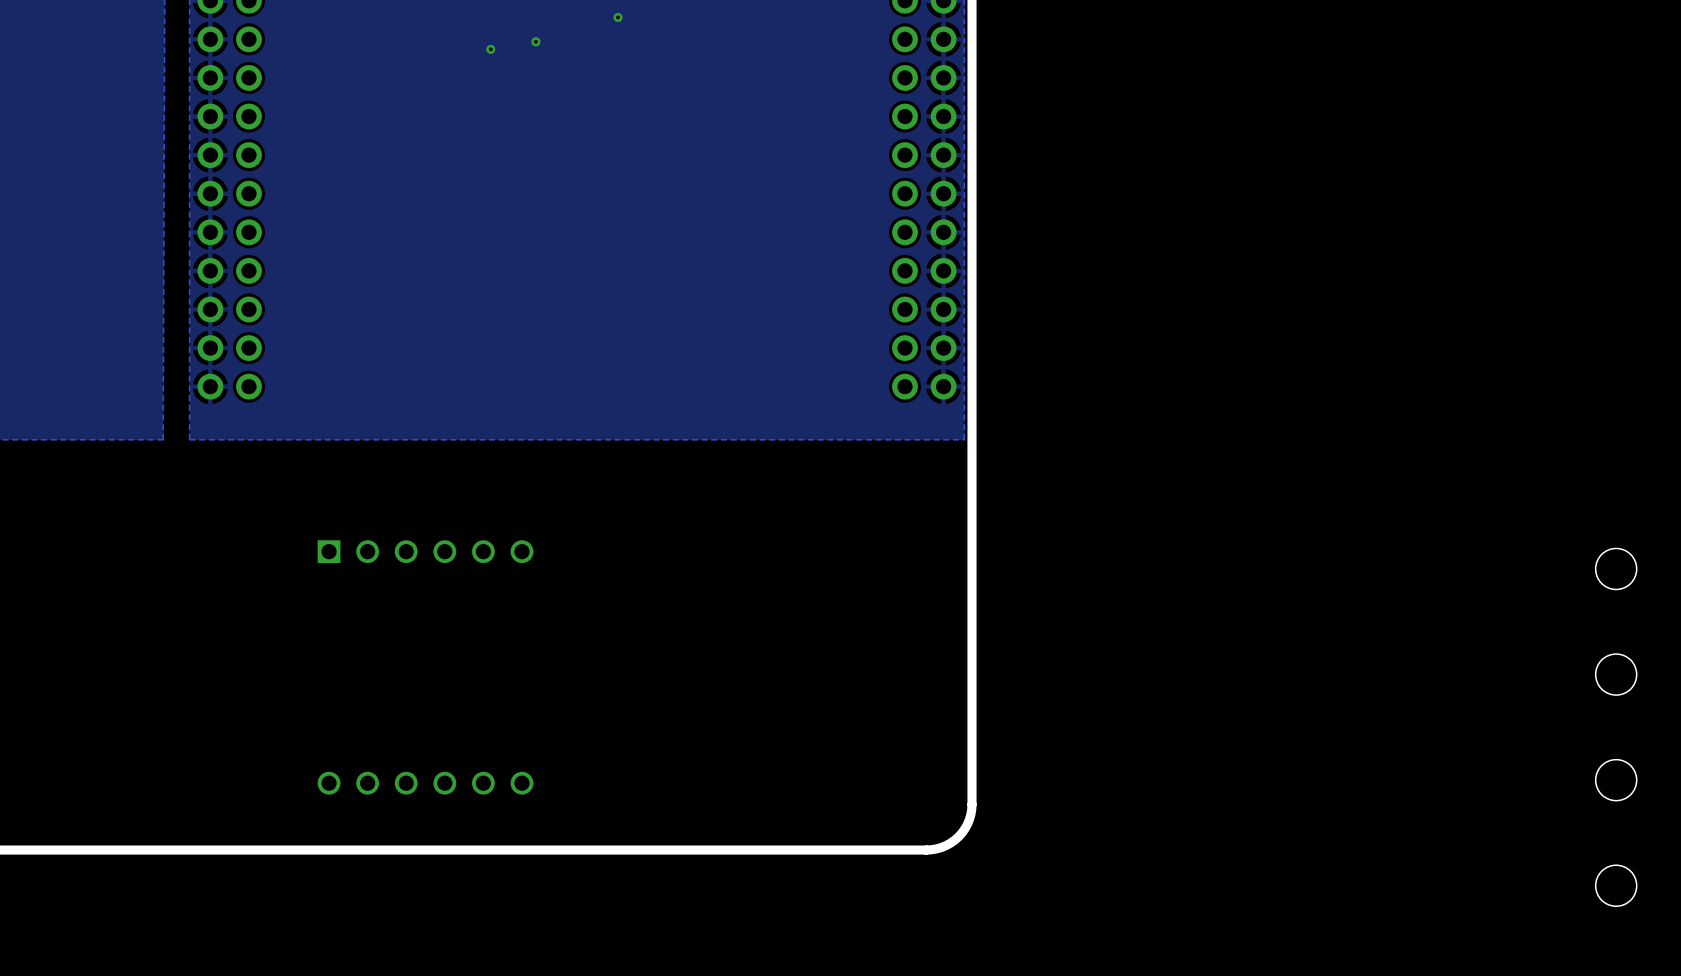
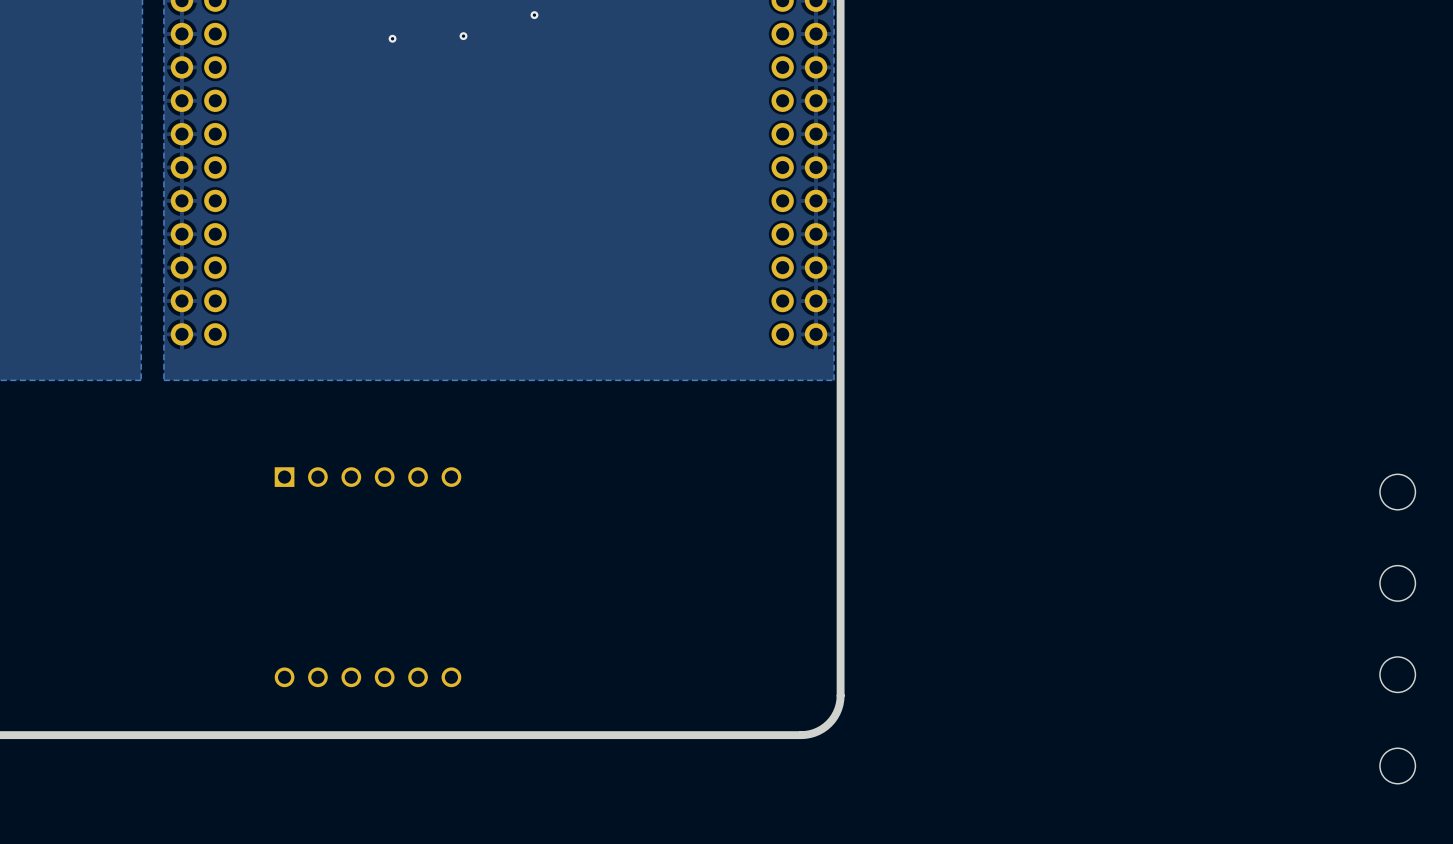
via position: (490, 49) -> (392, 38)

